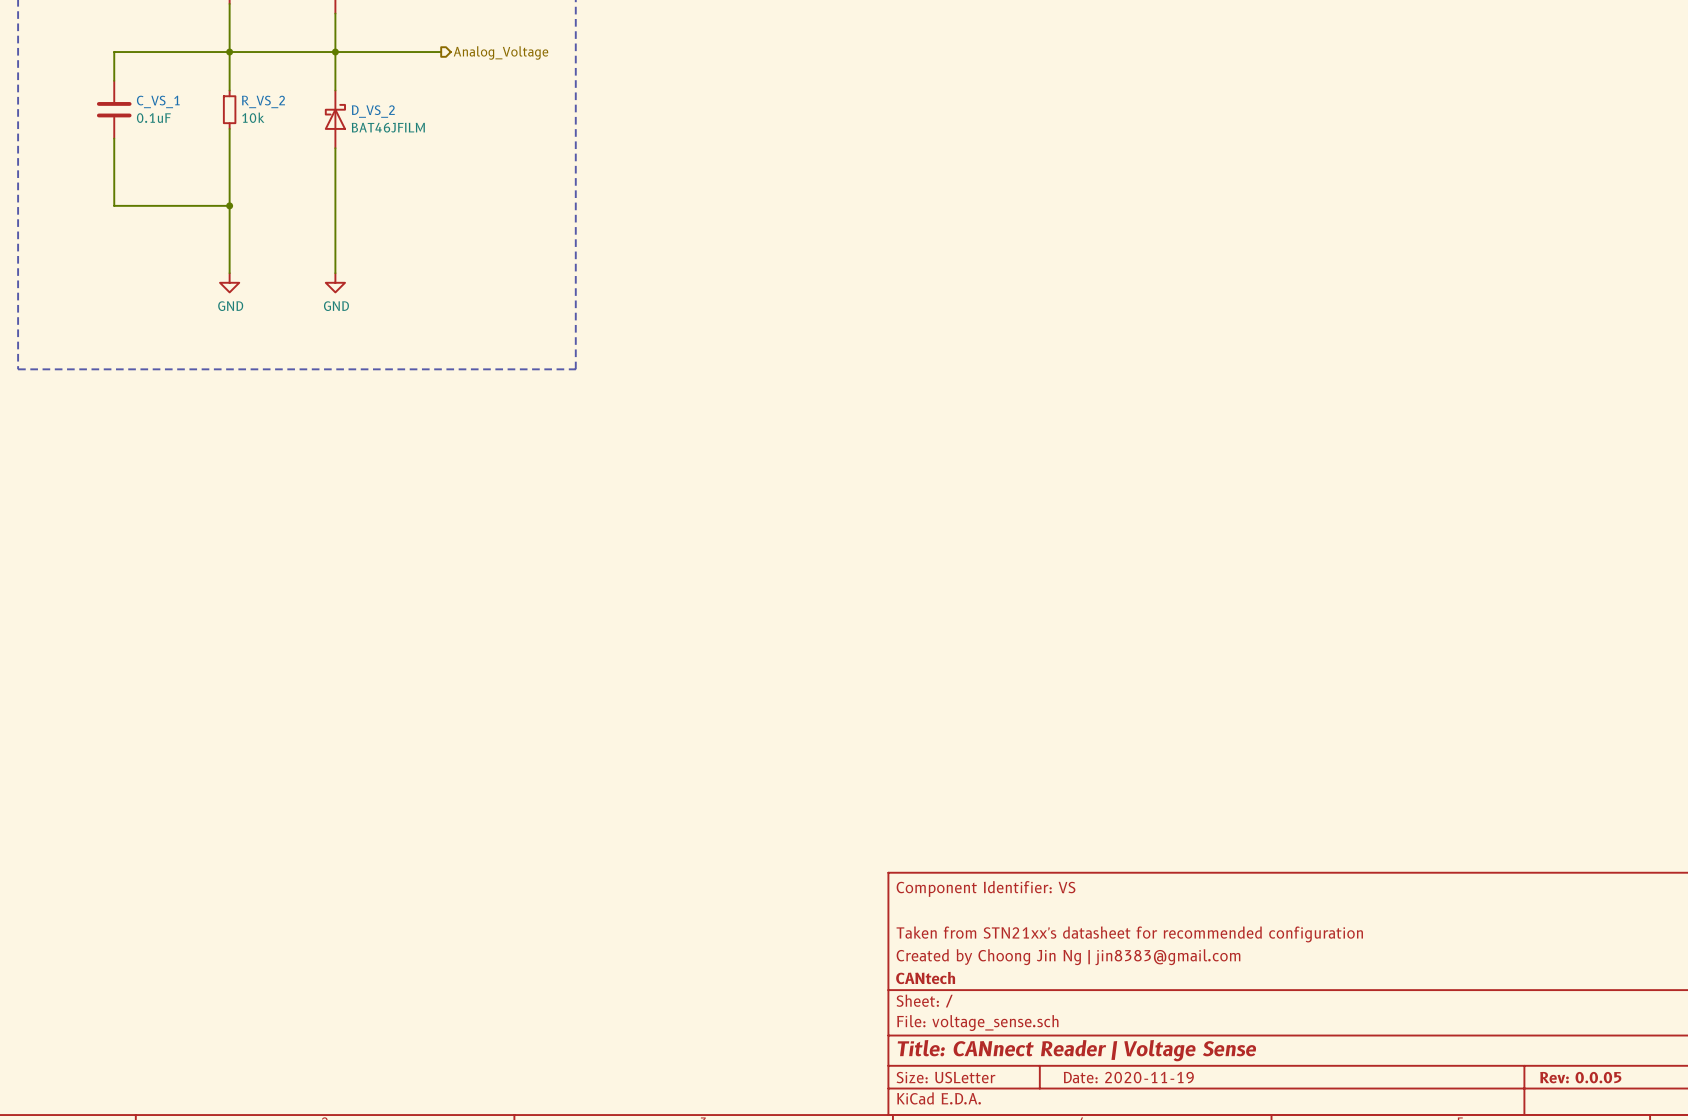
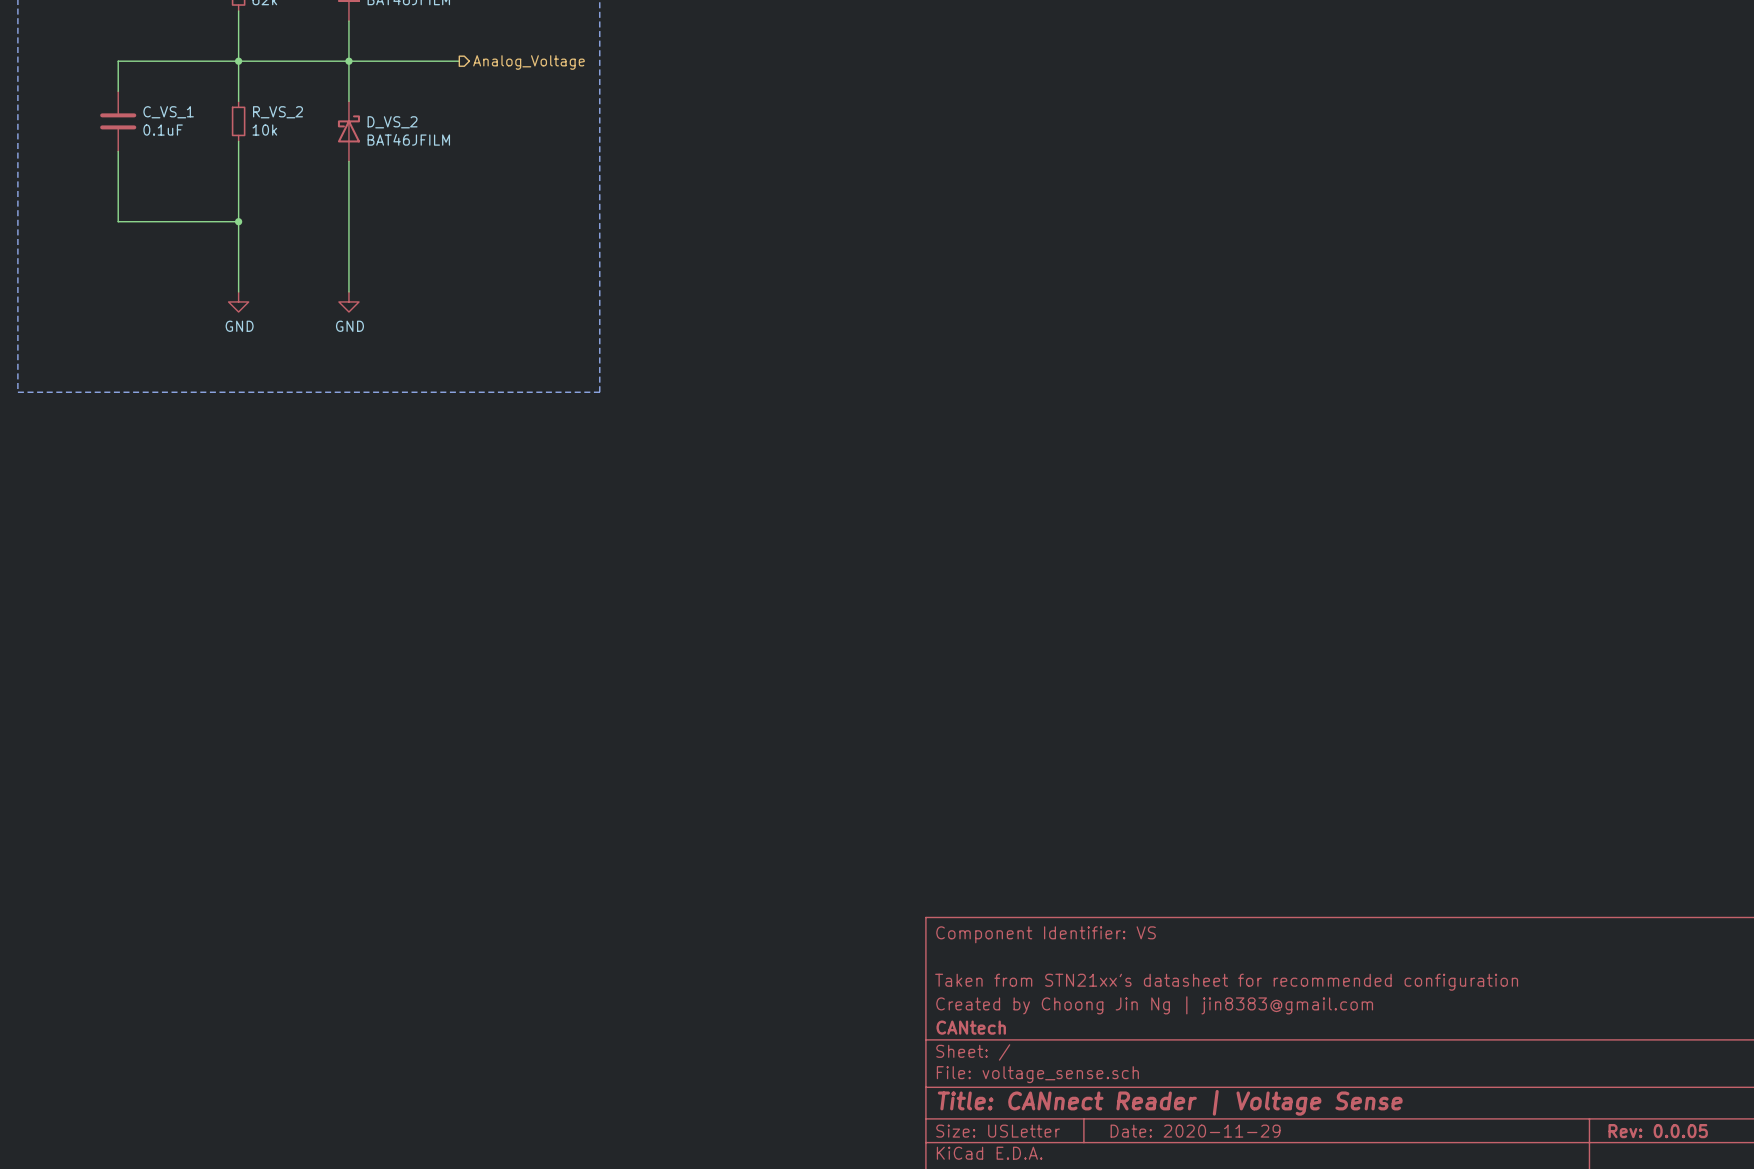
title block: Date: 2020-11-19 (1128, 1077) -> Date: 2020-11-29 (1195, 1131)

